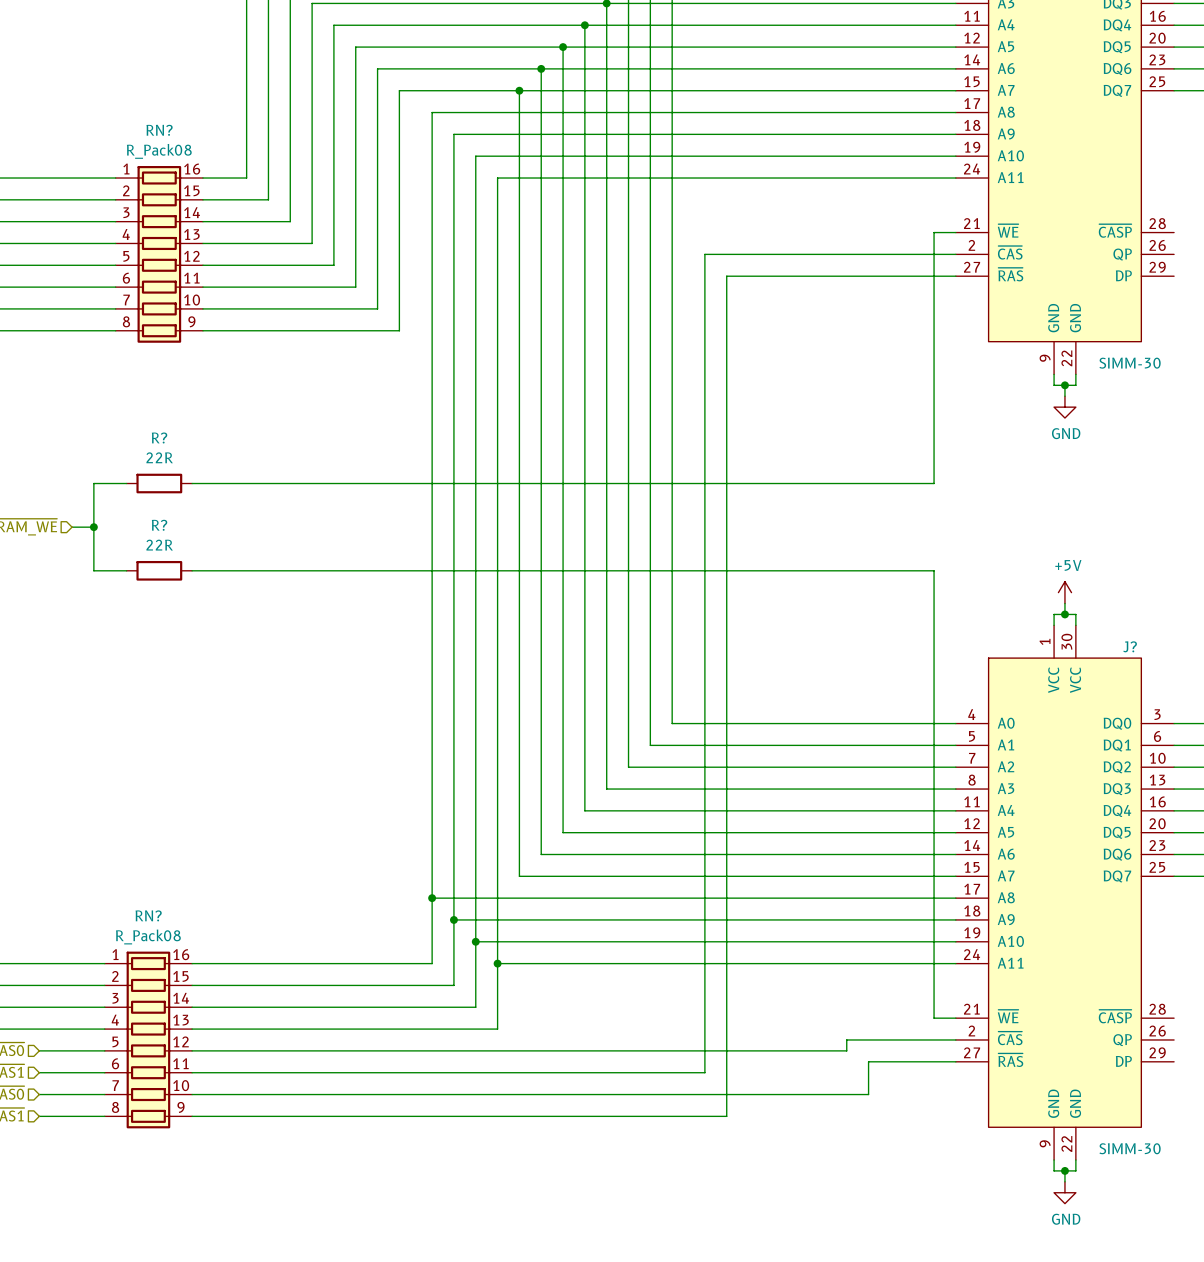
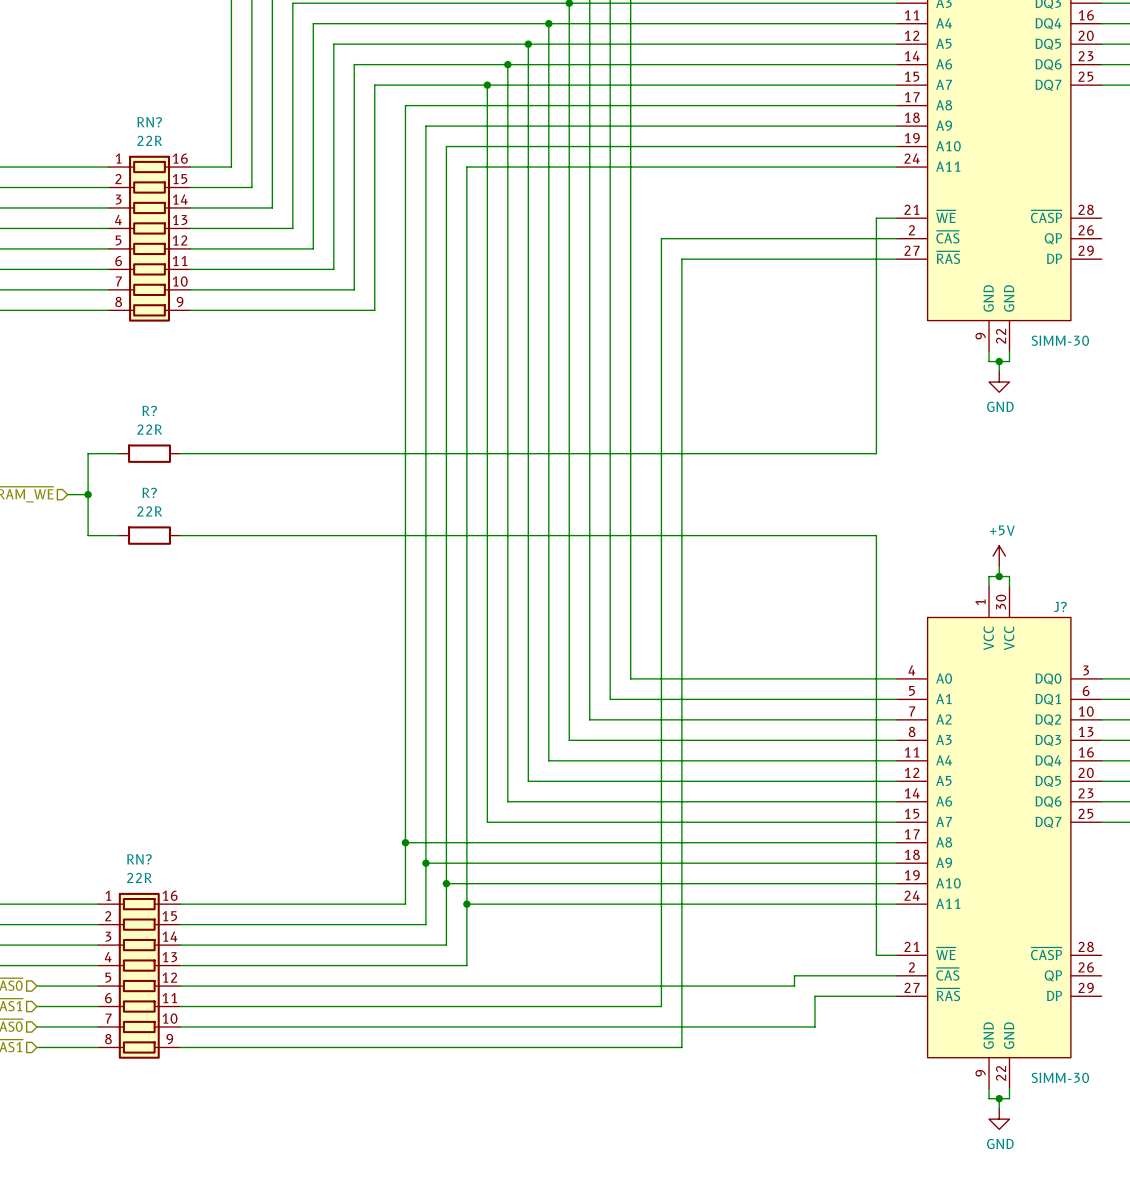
RN? value: R_Pack08 (159, 151) -> 22R (149, 140)
RN? value: R_Pack08 (148, 936) -> 22R (139, 877)

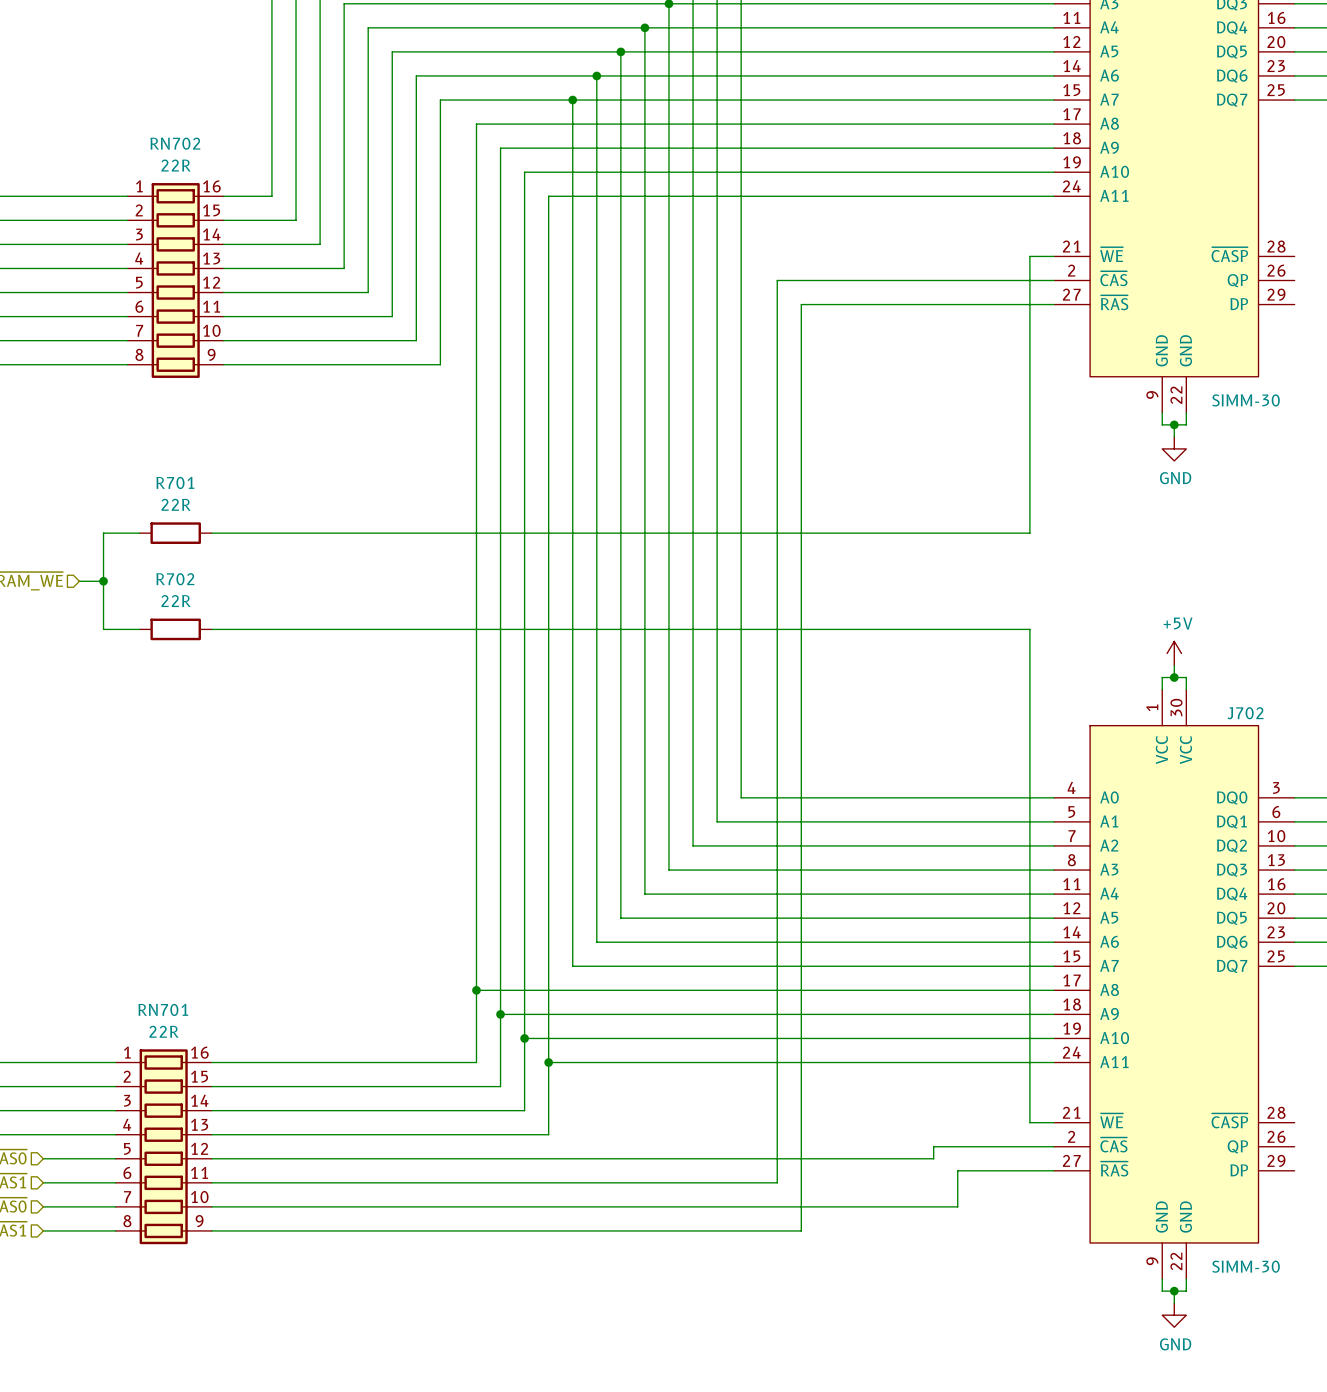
RN? name: RN? (149, 122) -> RN702 (175, 143)
R? name: R? (149, 410) -> R701 (175, 482)
R? name: R? (149, 492) -> R702 (175, 579)
J? name: J? (1060, 606) -> J702 (1245, 713)
RN? name: RN? (139, 859) -> RN701 (163, 1009)

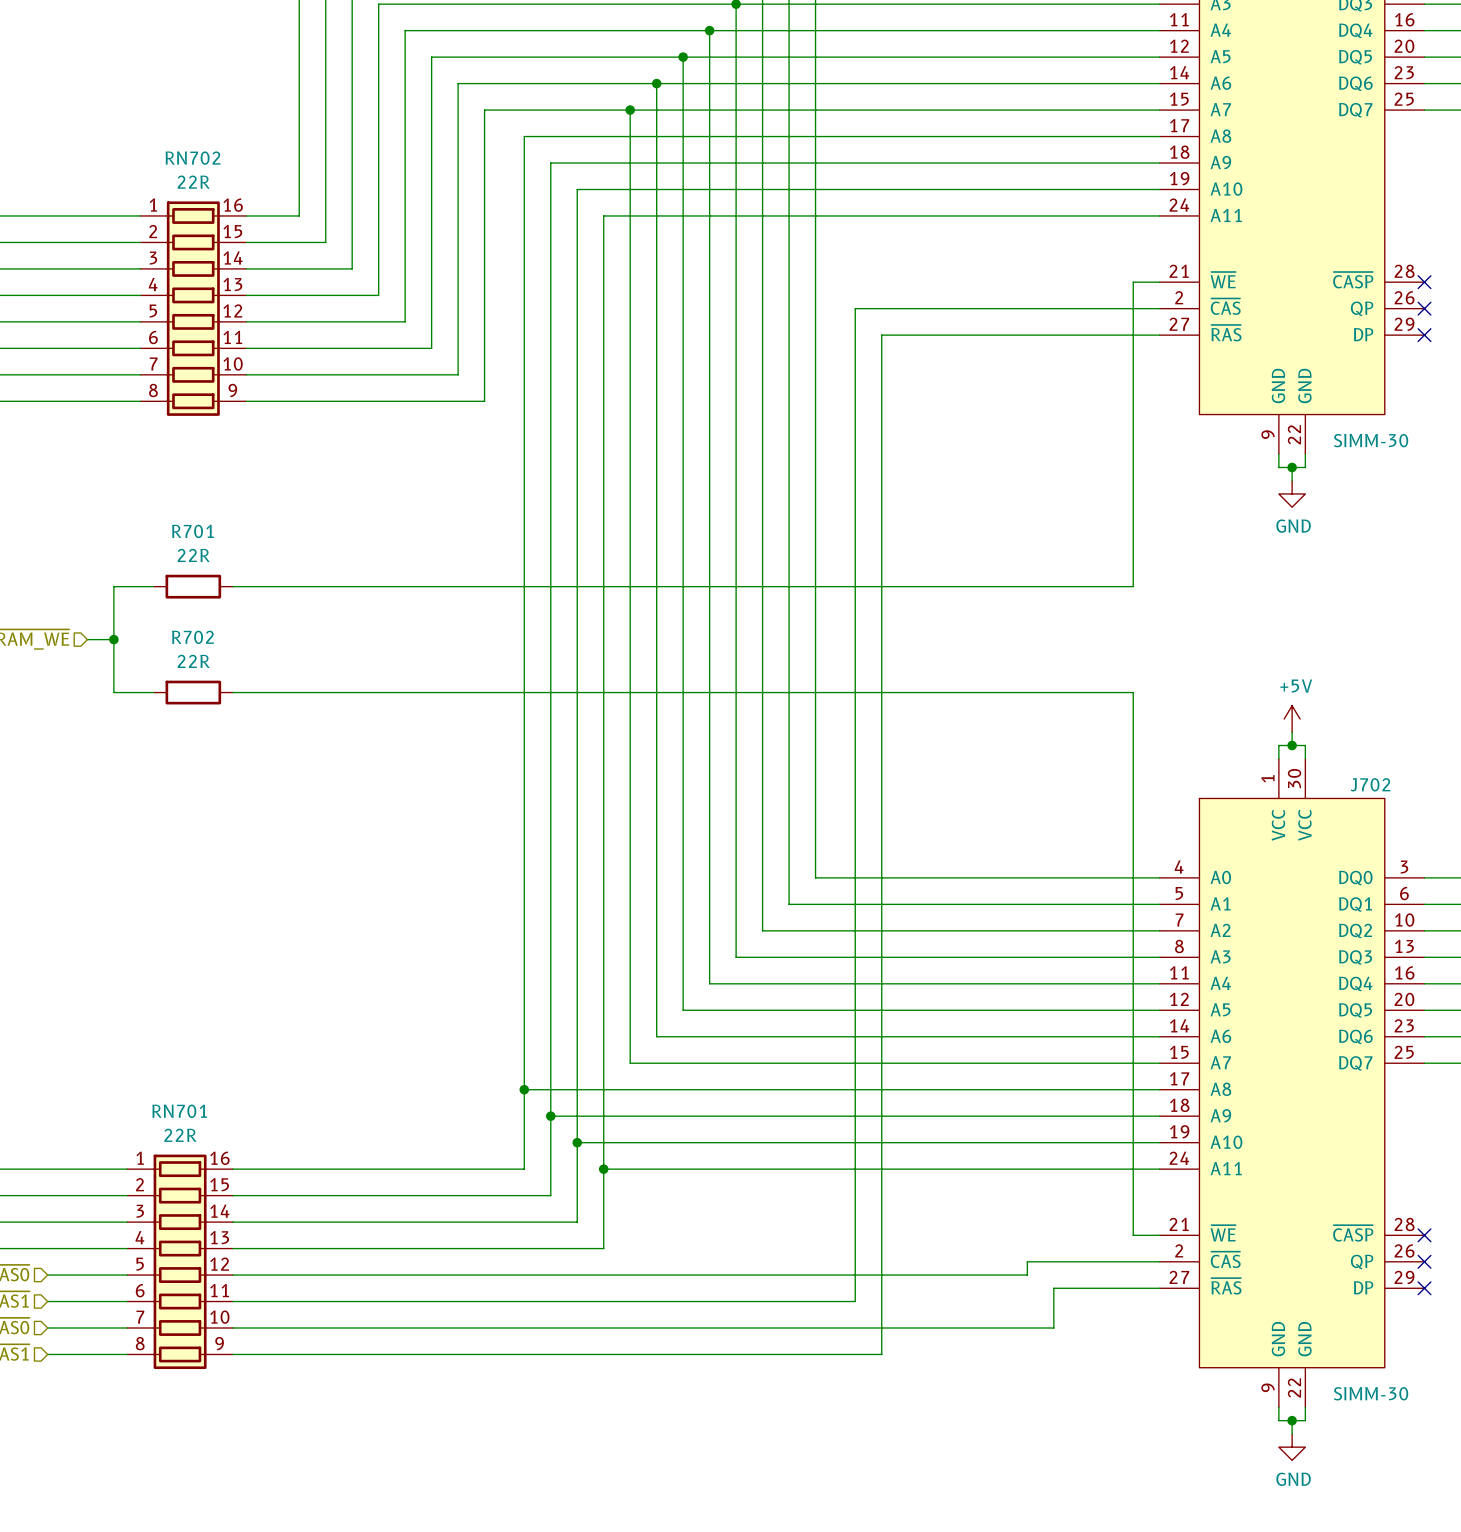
no-connect mark: none -> (1424, 282)
no-connect mark: none -> (1424, 308)
no-connect mark: none -> (1424, 335)
no-connect mark: none -> (1424, 1235)
no-connect mark: none -> (1424, 1261)
no-connect mark: none -> (1424, 1288)

